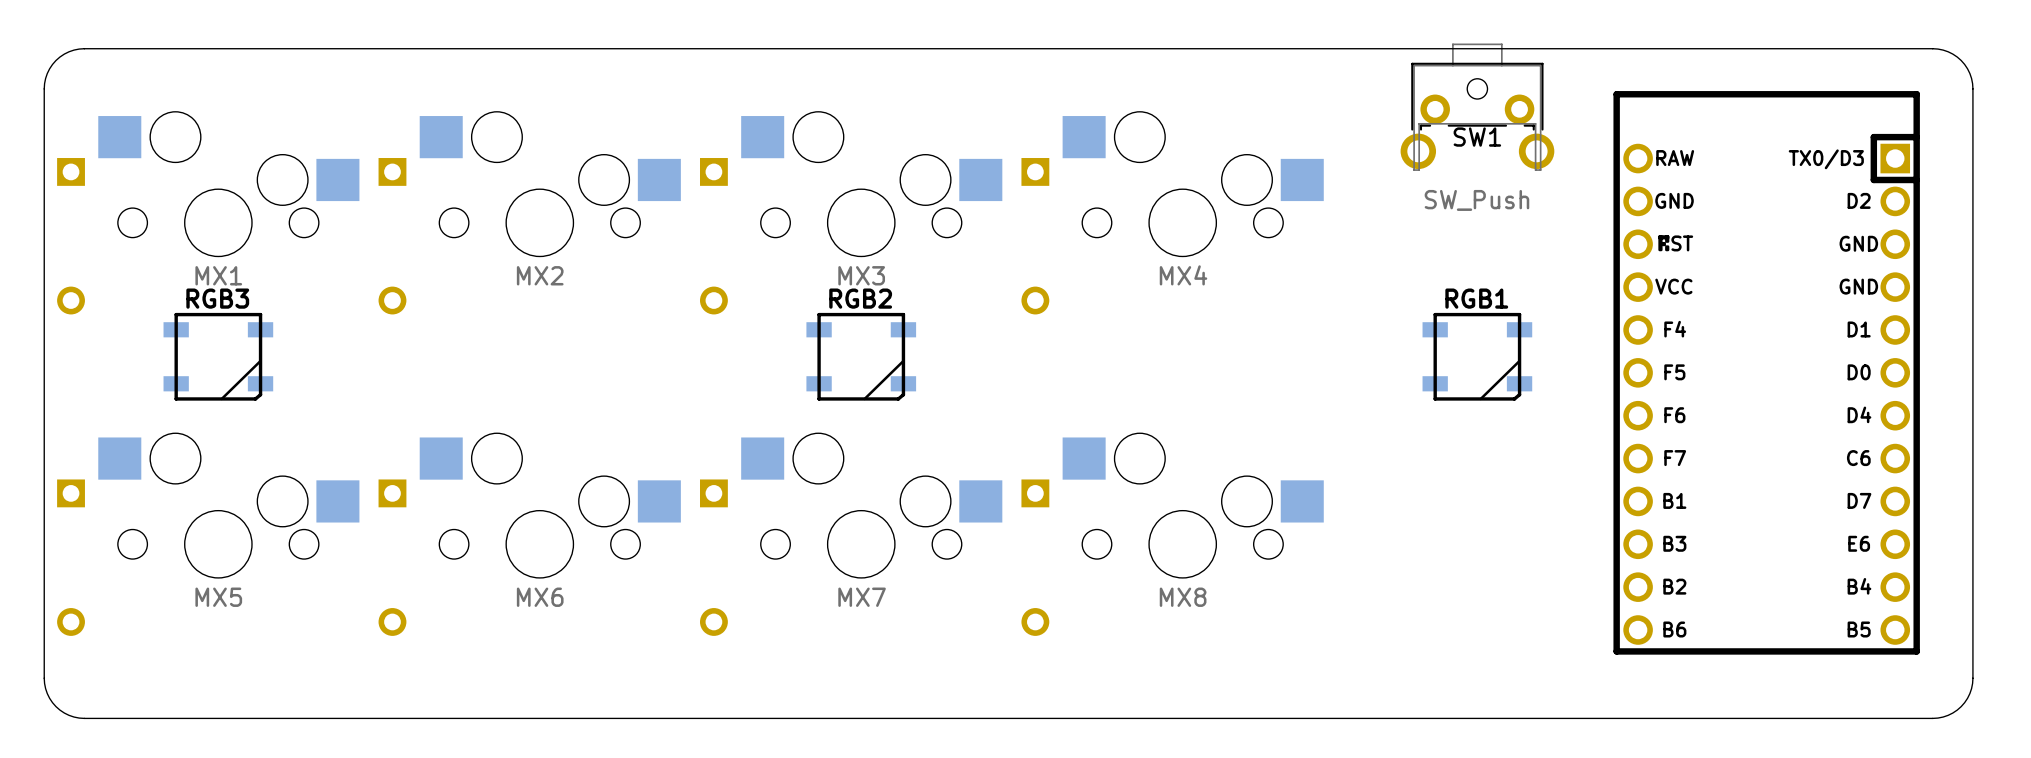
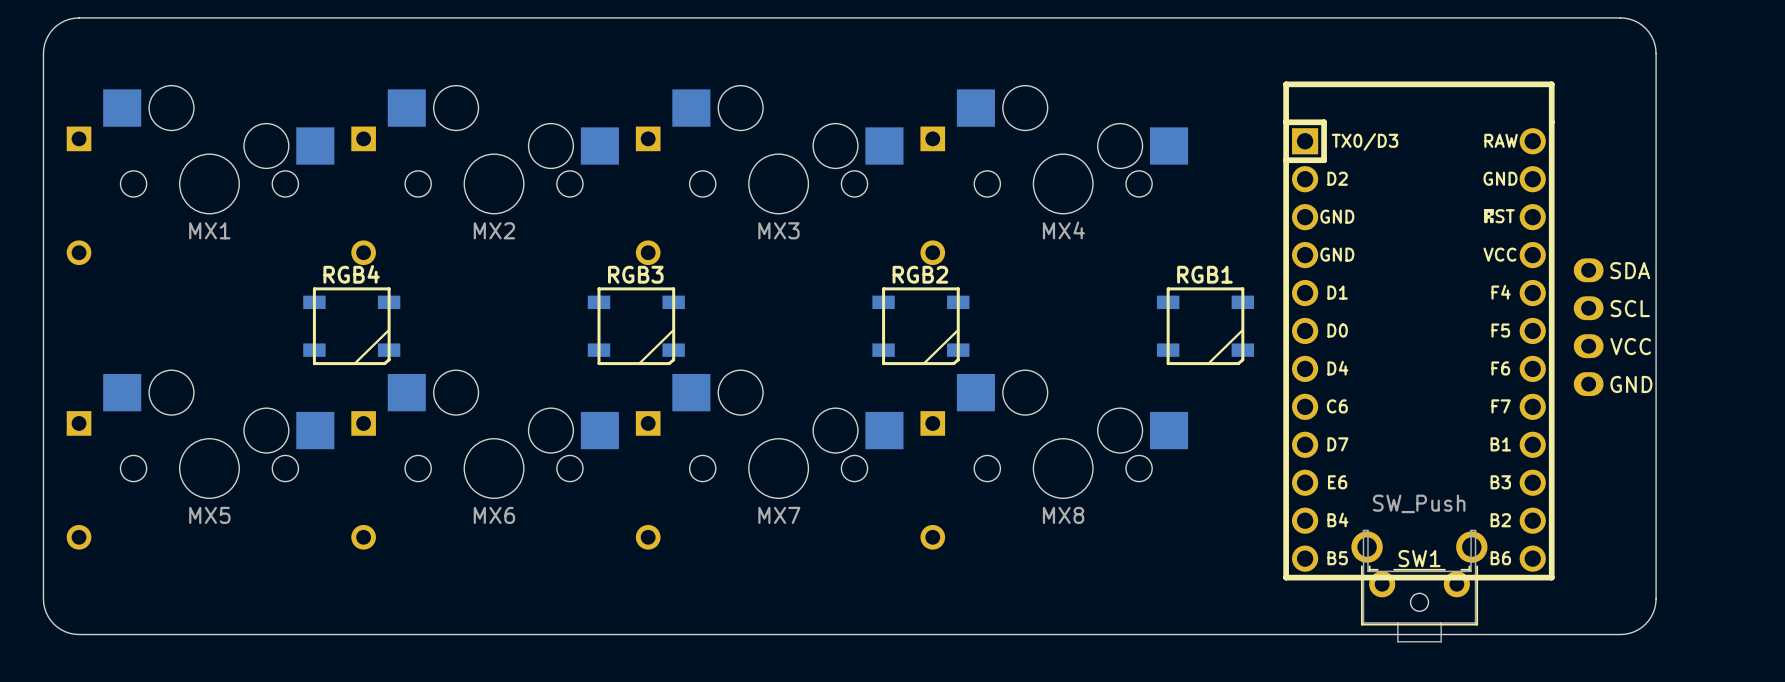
board edge: (1932, 48) (84, 48) (69, 51) (52, 64) (45, 78) (44, 88) (44, 678) (47, 693) (59, 710) (74, 717) (84, 718) (1932, 718) (1948, 715) (1957, 710) (1967, 698) (1972, 678) (1972, 88) (1969, 73) (1961, 60) (1948, 51) (1932, 48) -> (1620, 17) (1634, 20) (1645, 28) (1653, 39) (1656, 53) (1656, 598) (1651, 616) (1642, 627) (1634, 631) (1620, 634) (79, 634) (61, 629) (50, 620) (46, 612) (43, 598) (43, 53) (48, 35) (57, 25) (65, 20) (79, 17) (1620, 17)
part footprint: [1613, 91, 1920, 655] -> [1573, 258, 1604, 397]
SW1 rotation: 0° (1477, 107) -> 180° (1419, 586)
SW1 position: (1477, 107) -> (1419, 586)
text: none -> SDA (1630, 270)
RGB3 position: (218, 356) -> (636, 326)
RGB2 position: (861, 356) -> (920, 326)
RGB1 position: (1477, 356) -> (1205, 326)
text: none -> SCL (1630, 308)
RGB4: none -> (351, 326)
part: none -> (1418, 330)
text: none -> VCC (1630, 346)
text: none -> GND (1631, 384)

